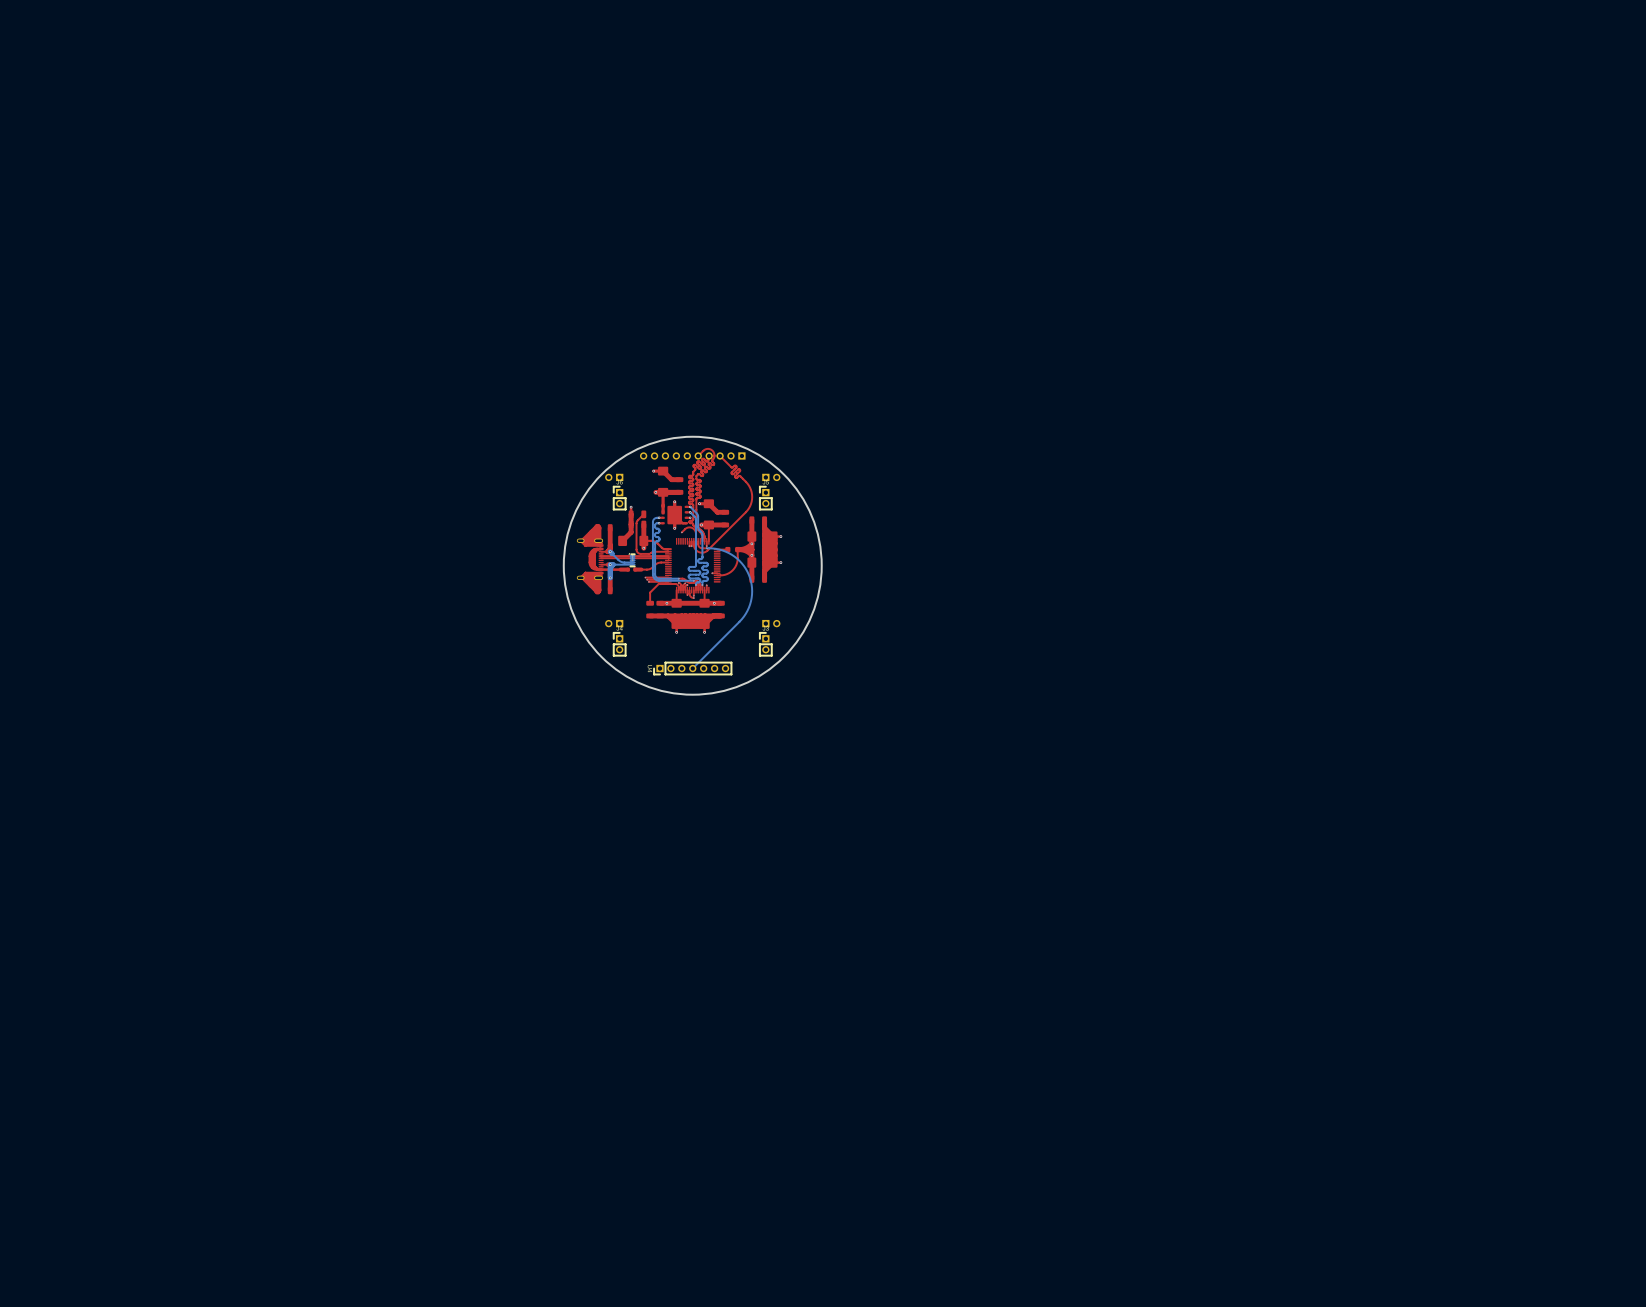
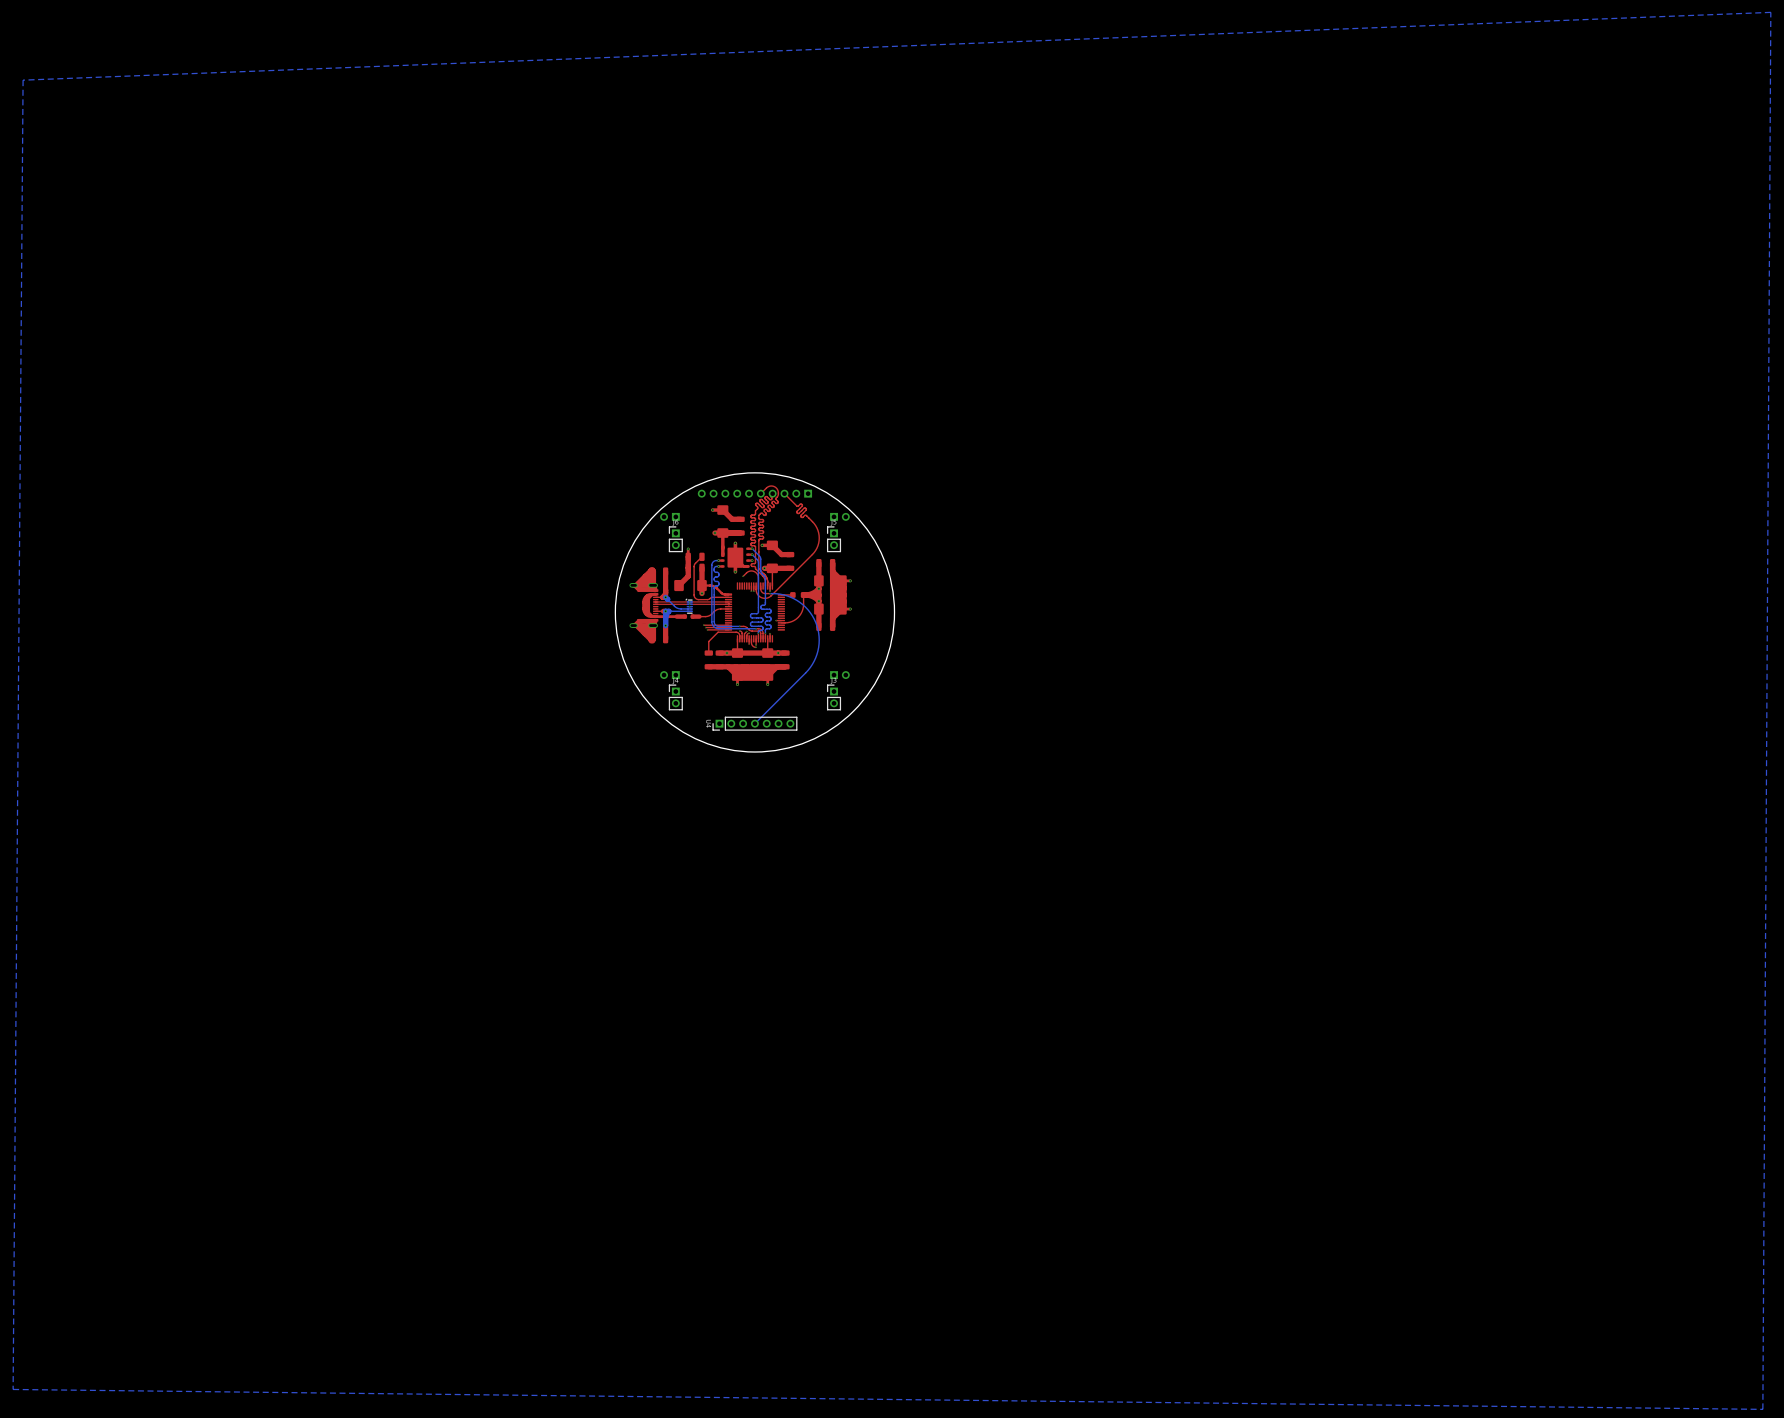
bottom zone outline: none -> (1770, 12) (1762, 1409) (13, 1389) (23, 80) (1770, 12)

